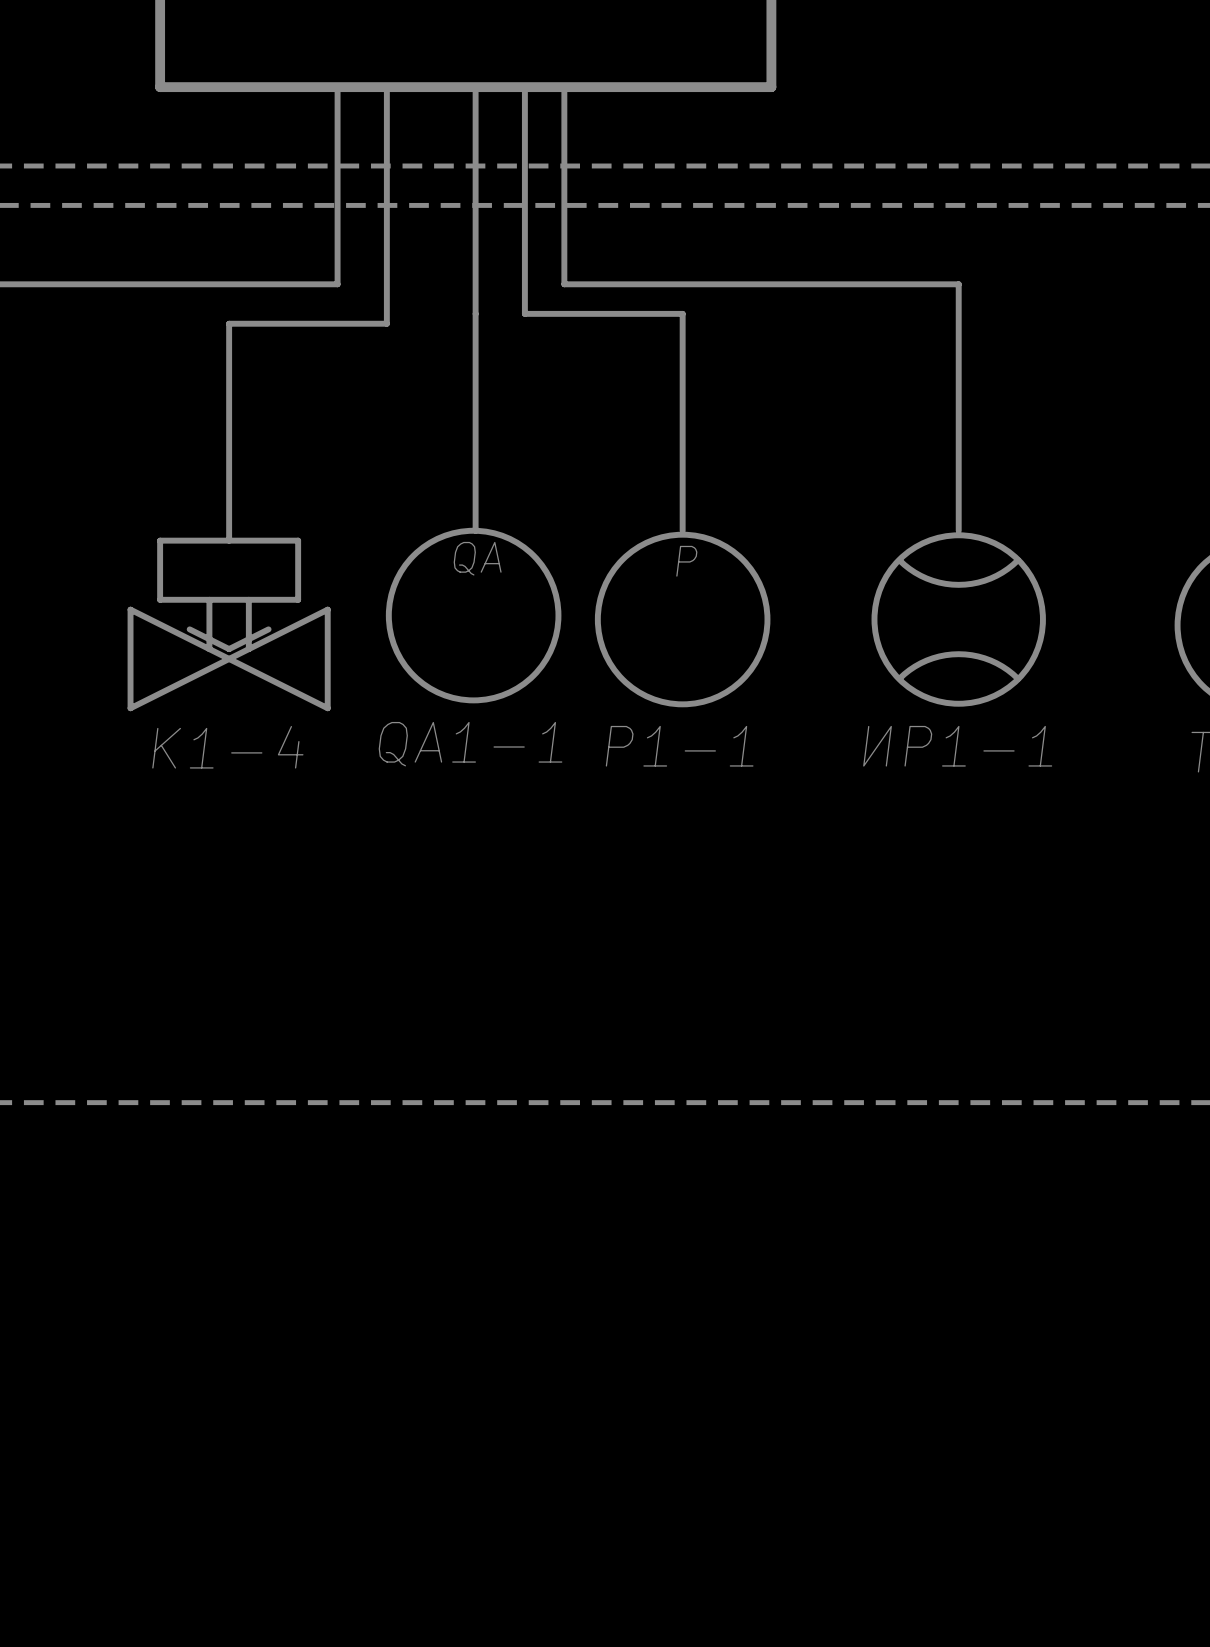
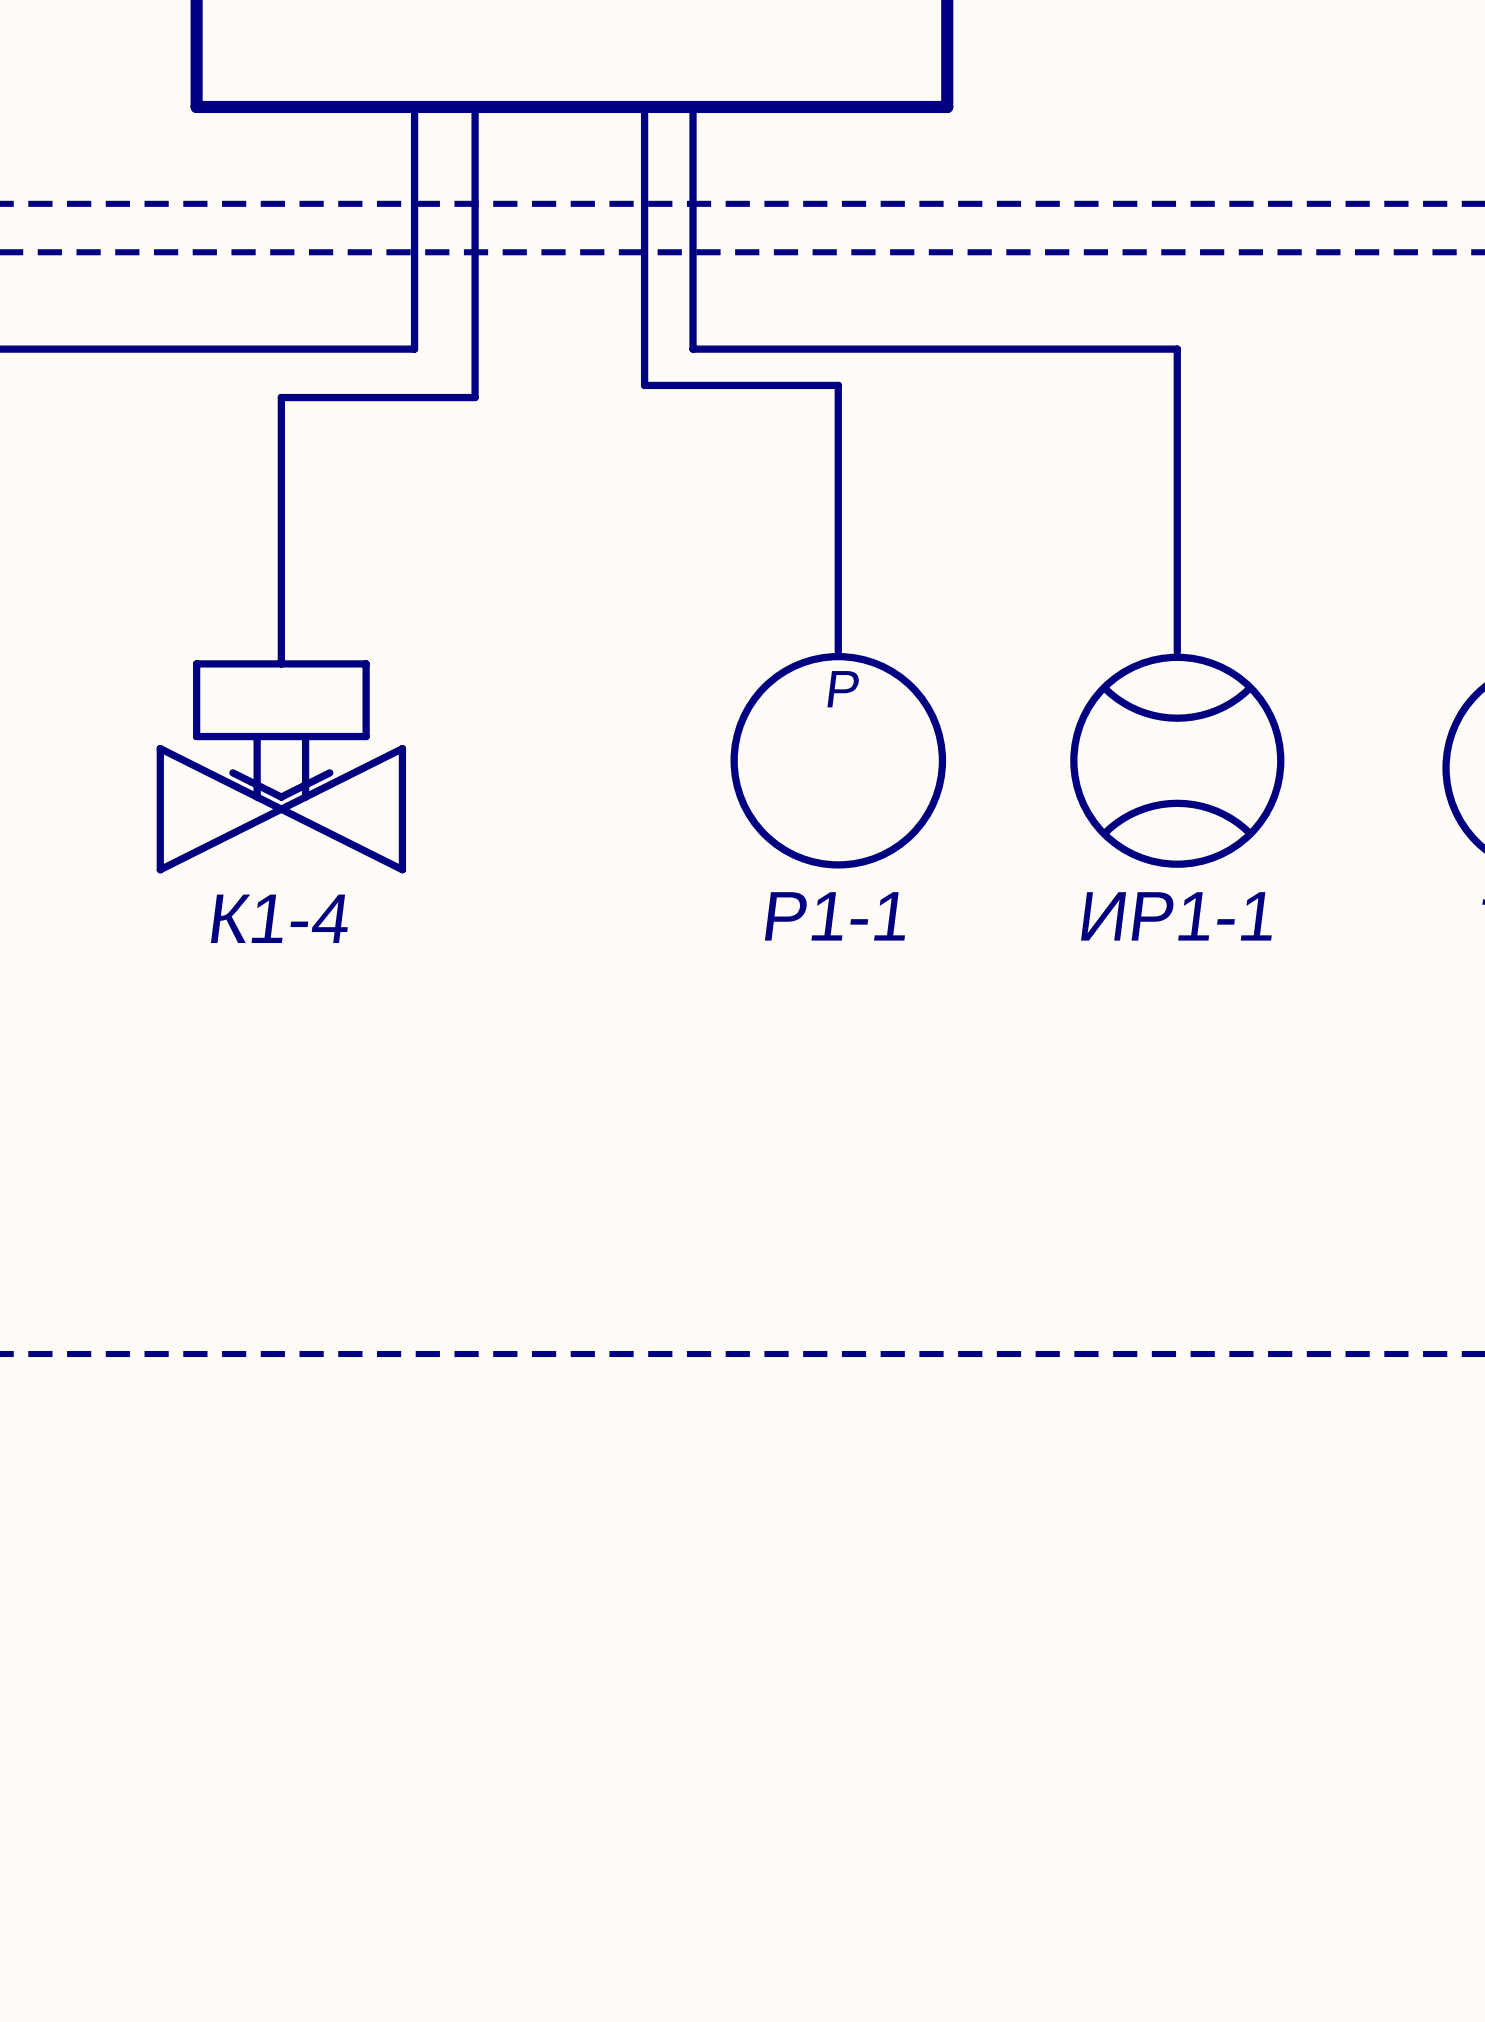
line: (475, 87) (475, 530) -> none
drawing: [385, 527, 562, 704] -> none
text: QA (477, 558) -> none
text: QA1-1 (470, 744) -> none

